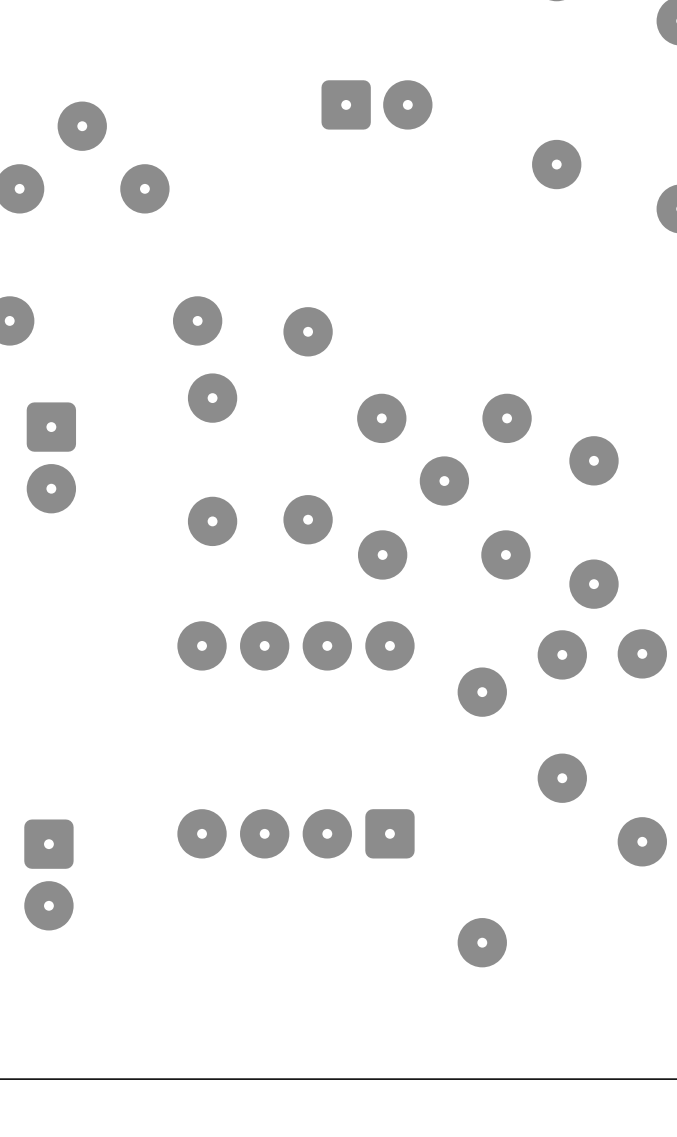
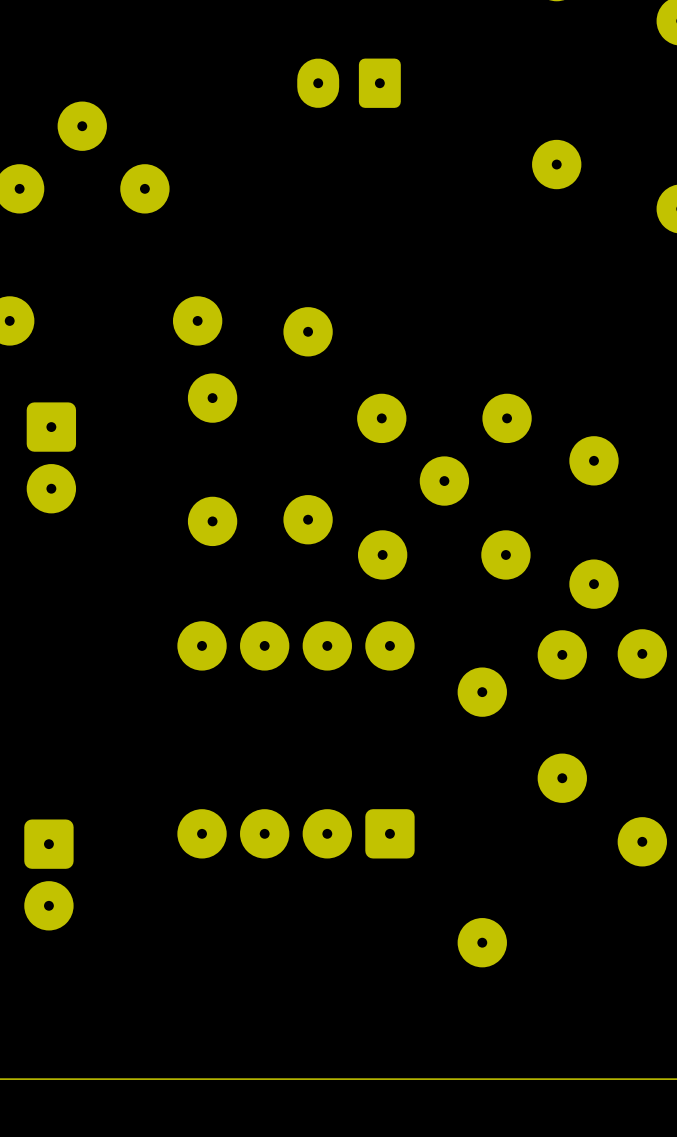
part: none -> (349, 83)
part: (376, 104) -> none

